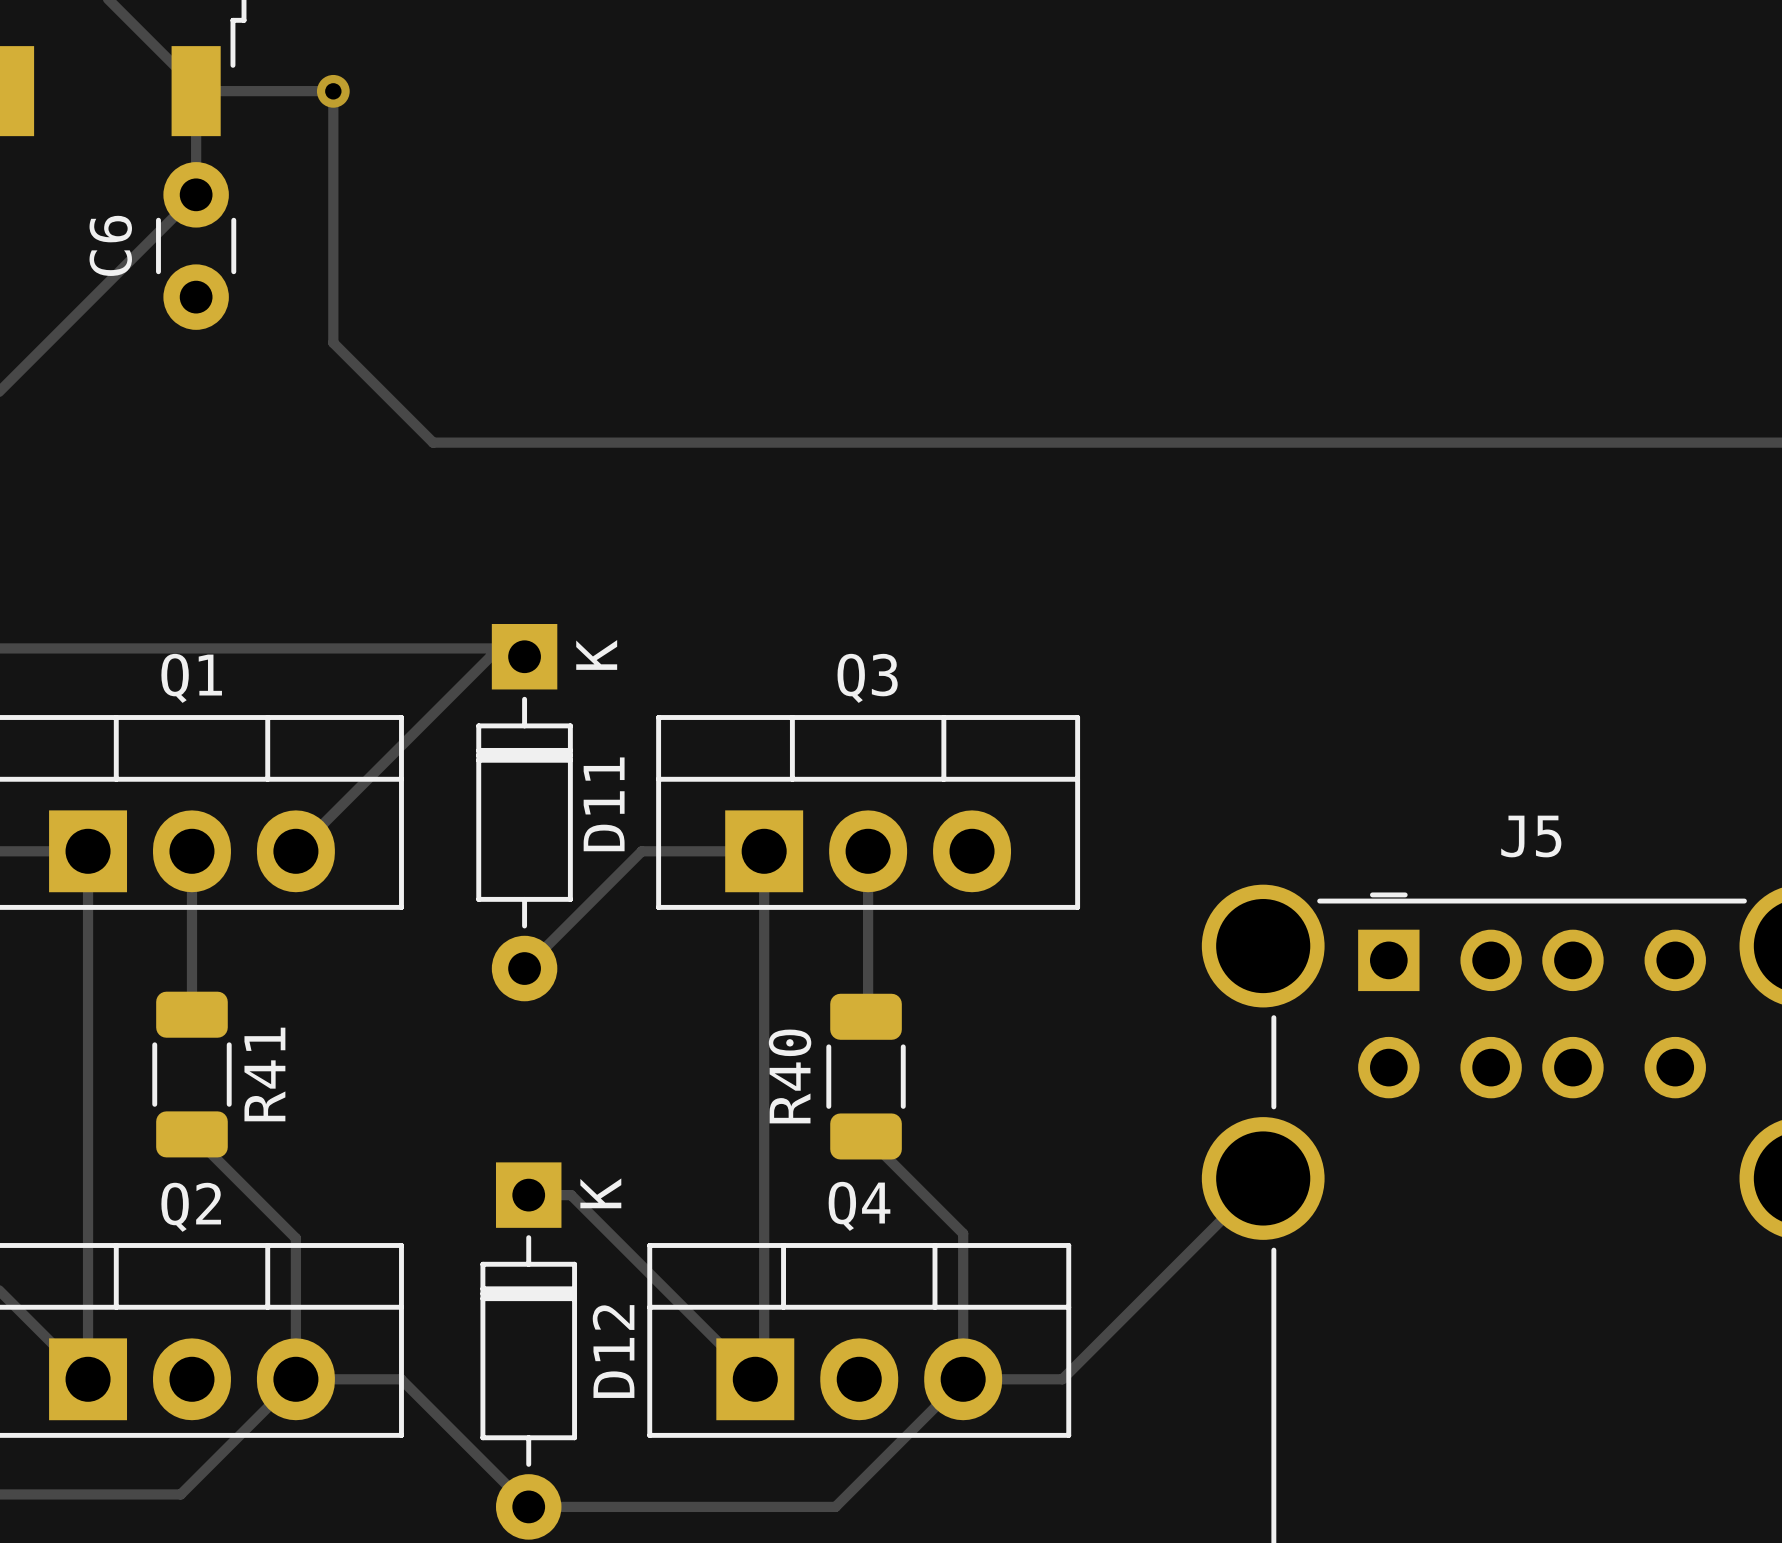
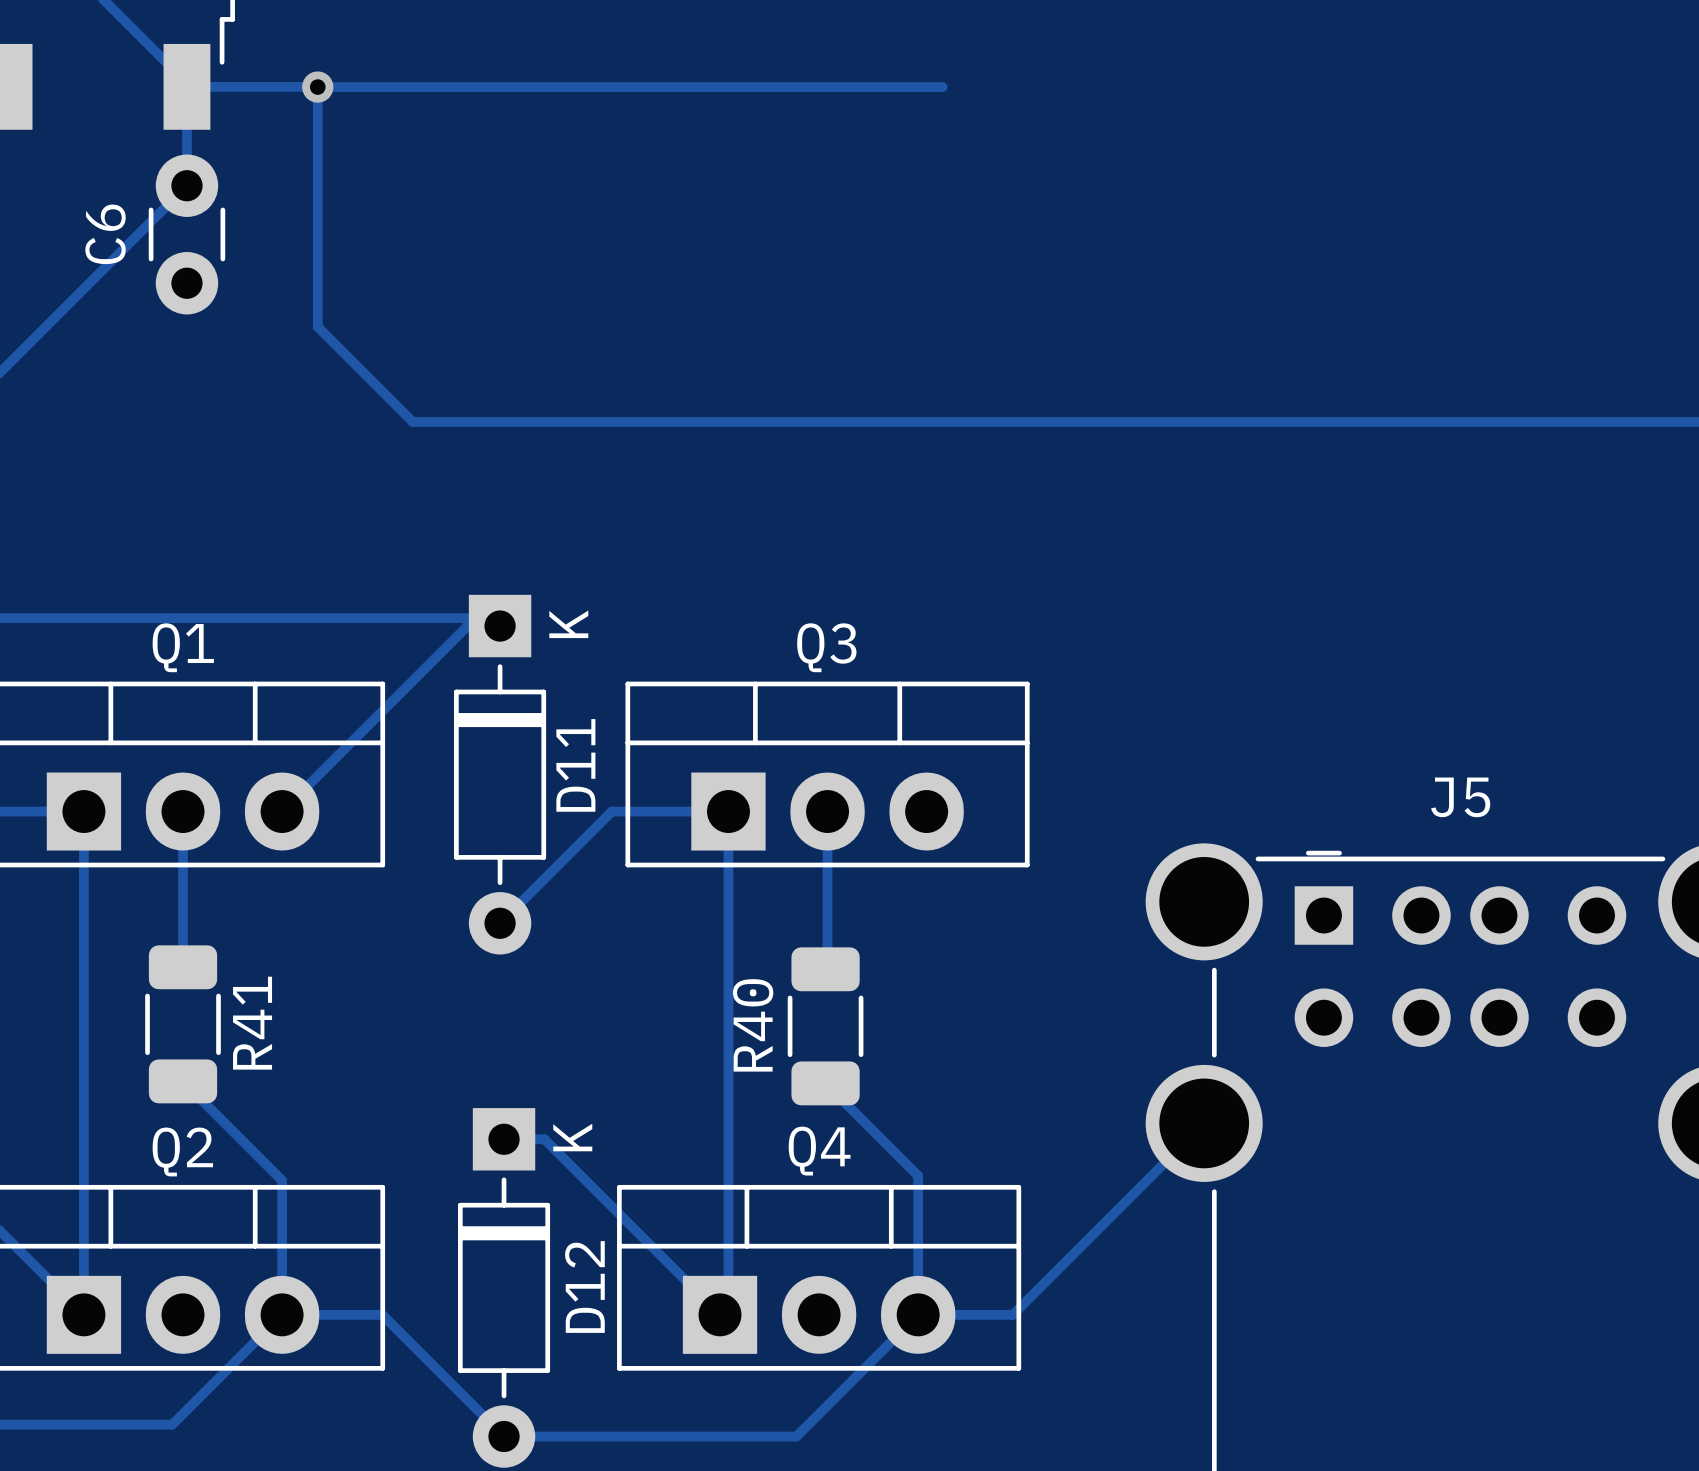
track: none -> (317, 87) (942, 87)

